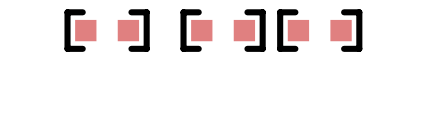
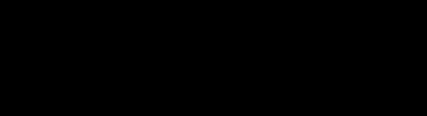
part: (107, 30) -> none
part: (223, 30) -> none
part: (319, 30) -> none

